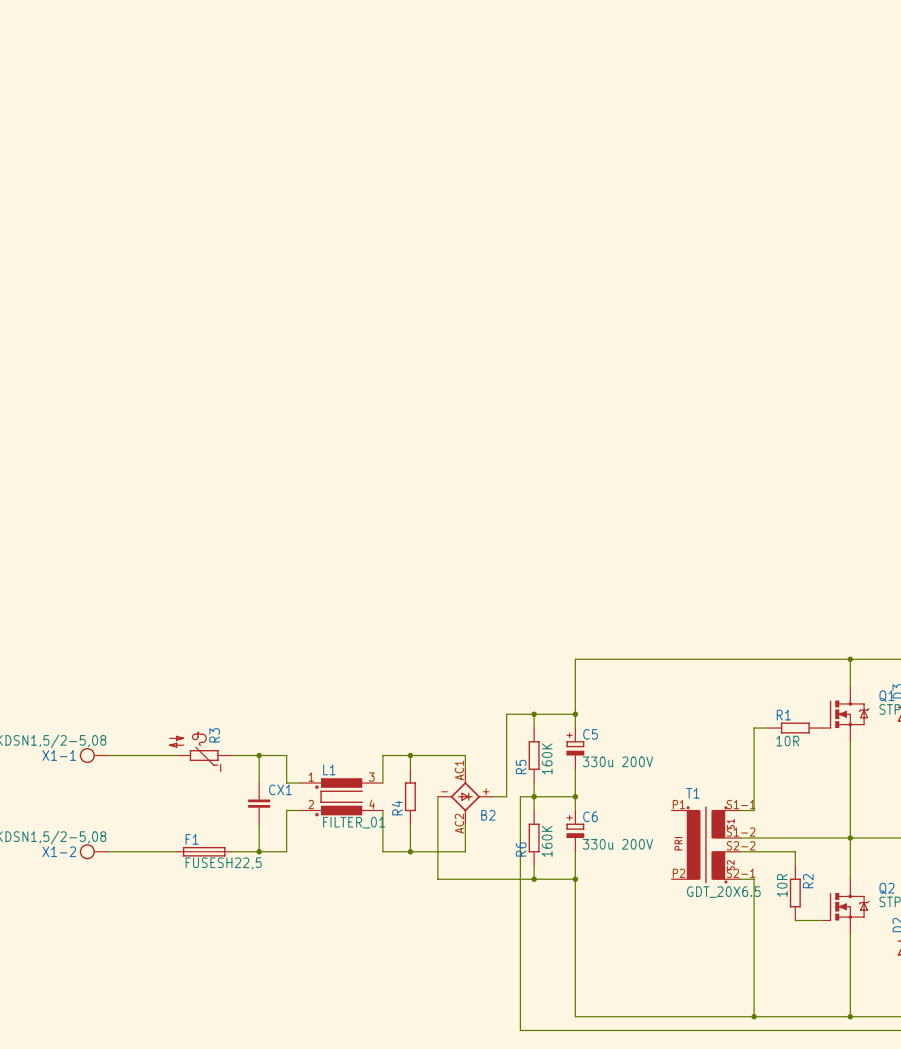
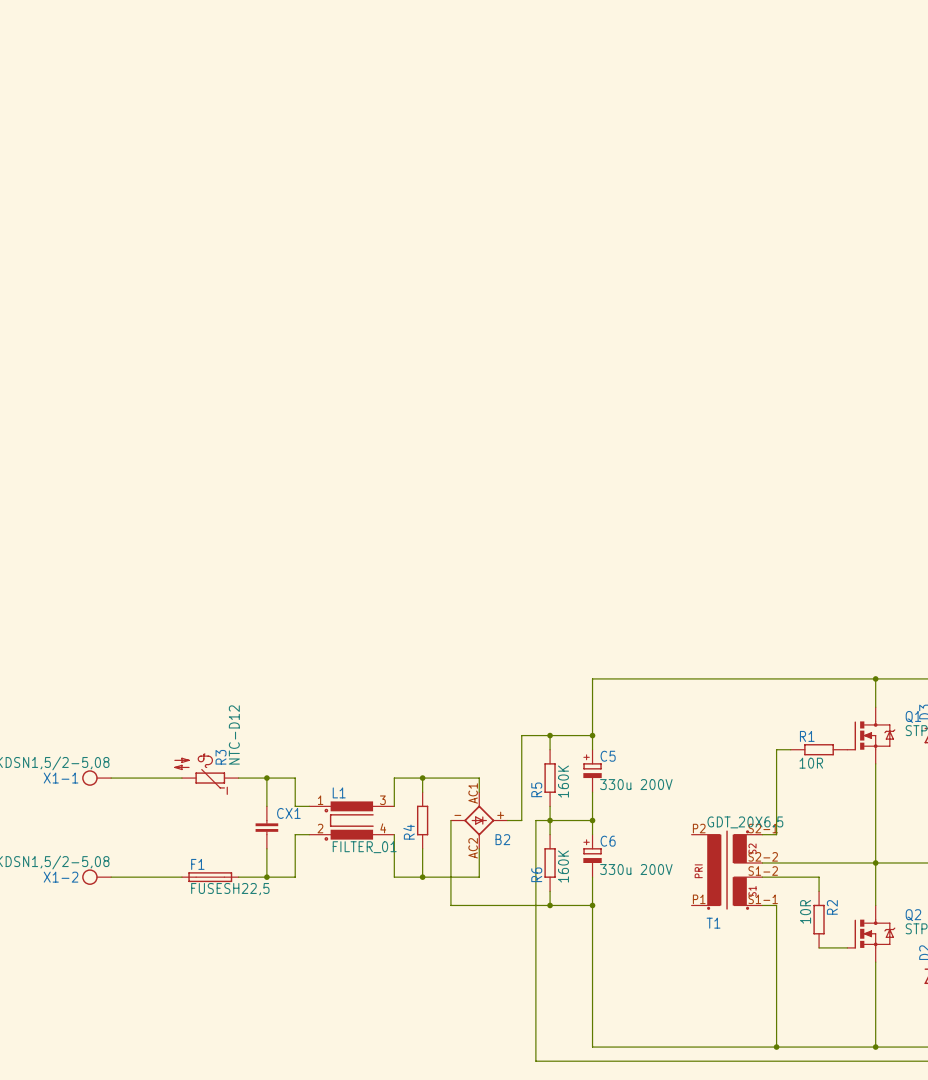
R3 value: none -> NTC-D12 (234, 734)
T1 flip: as is (707, 844) -> up-down (728, 870)

